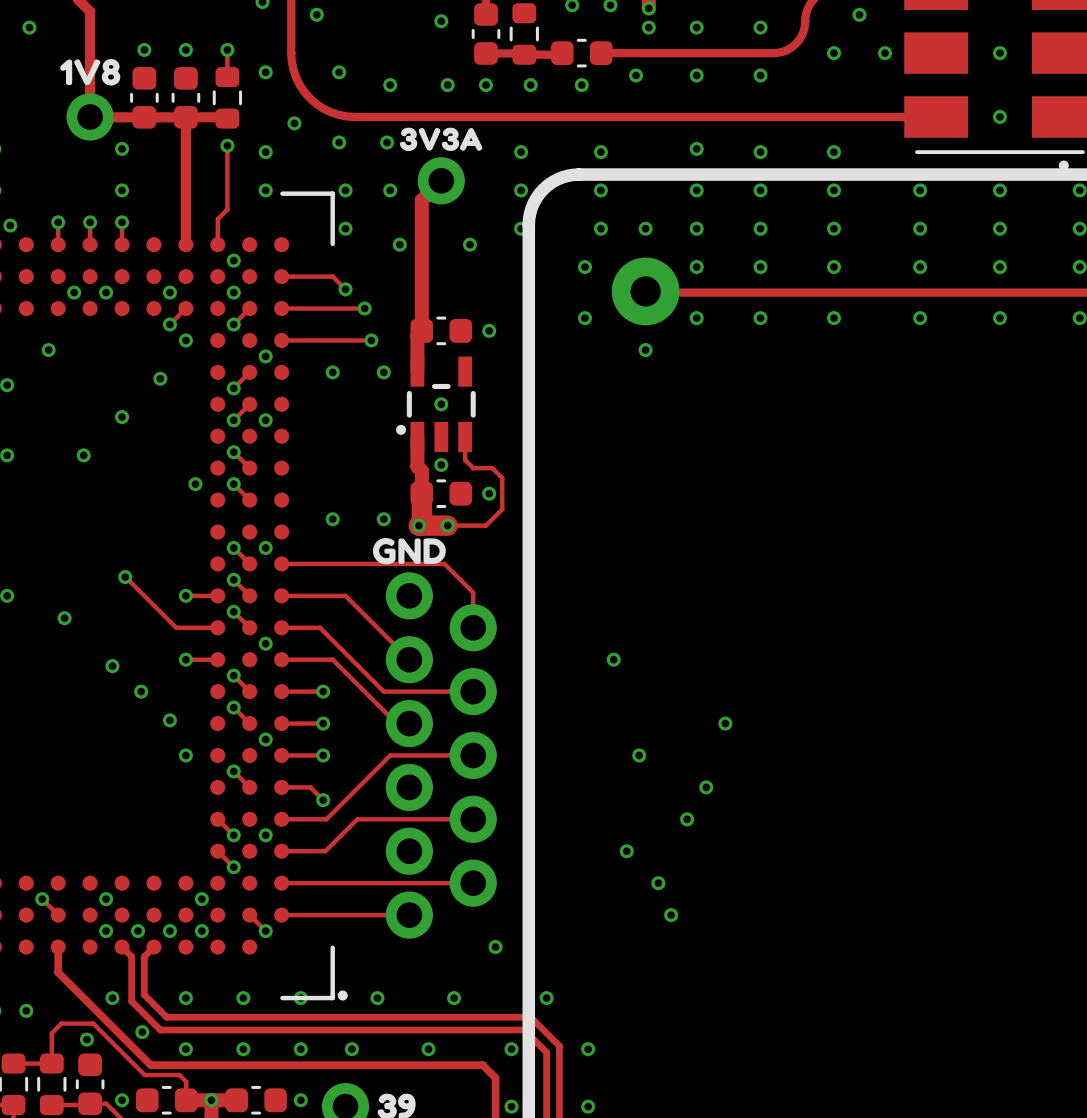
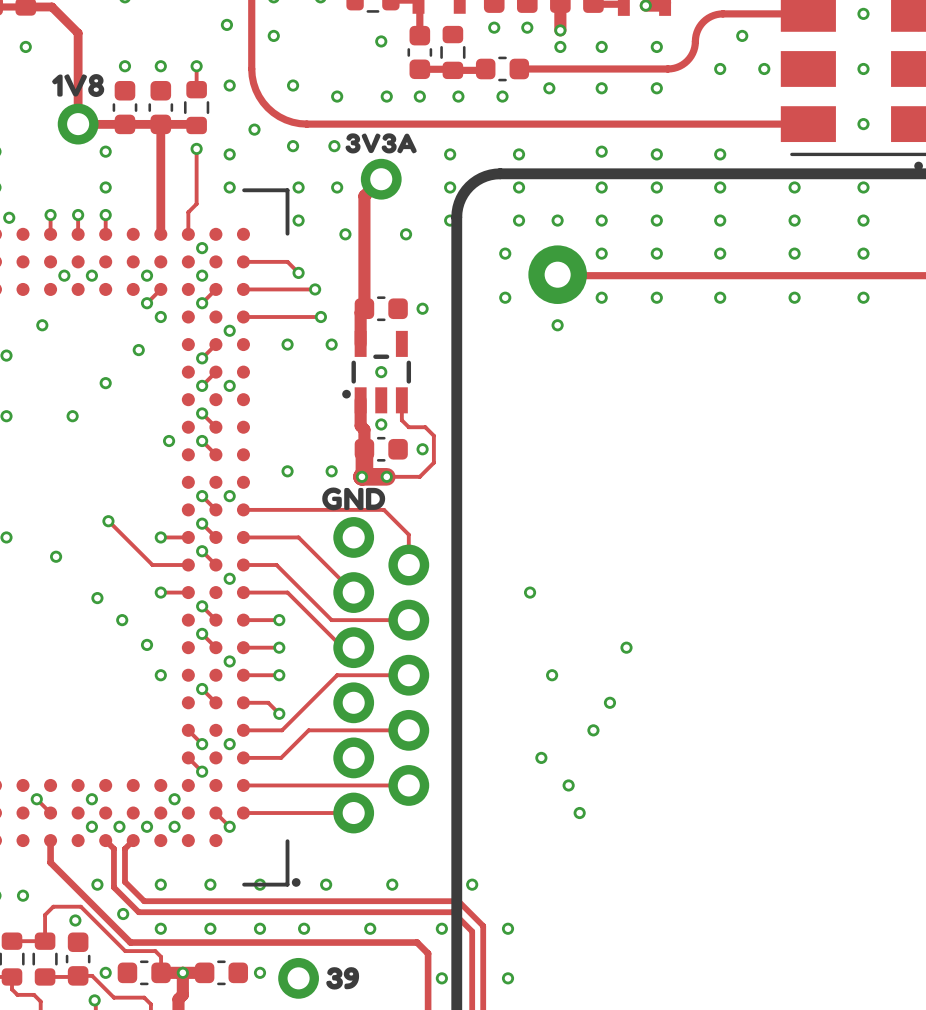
via: (495, 947) -> none

